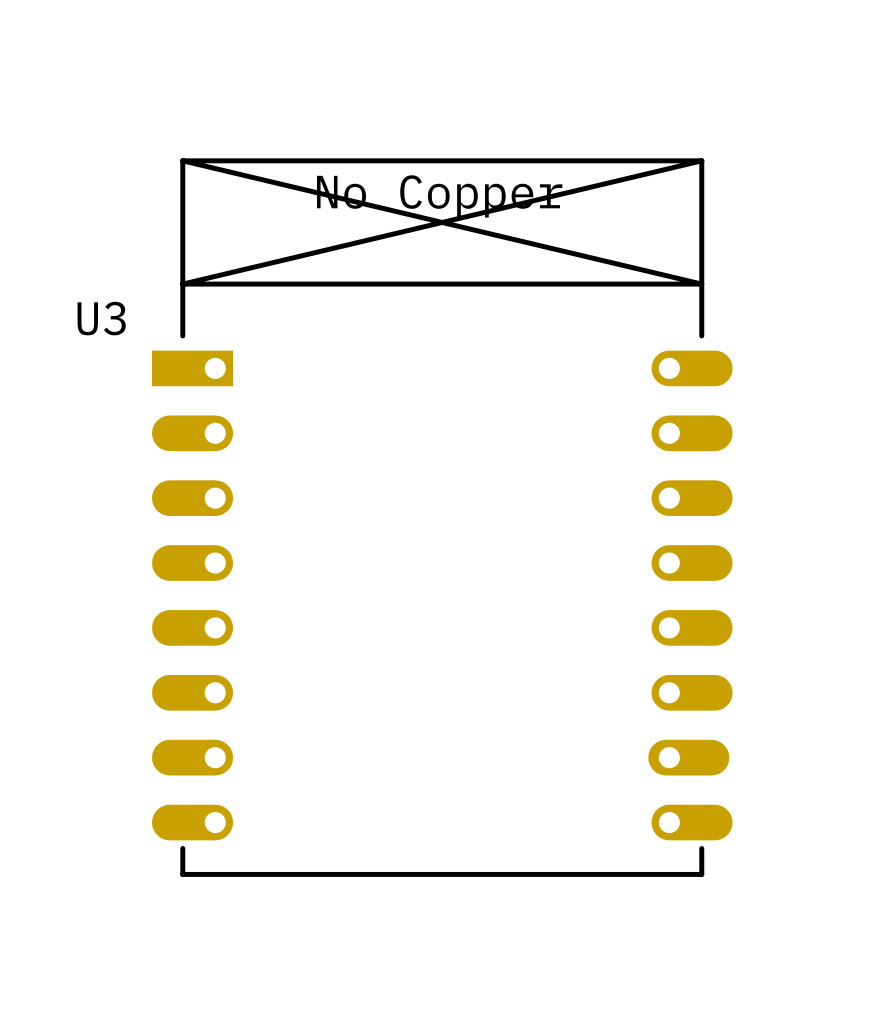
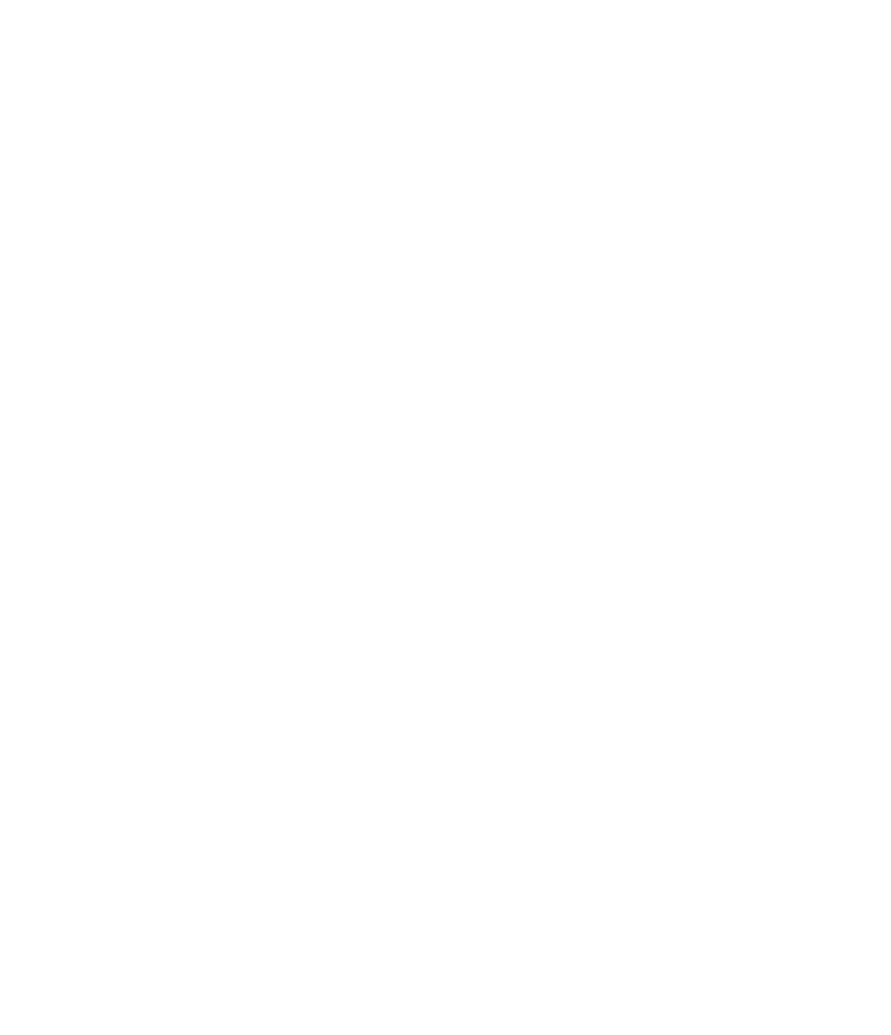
U3: (442, 517) -> none

